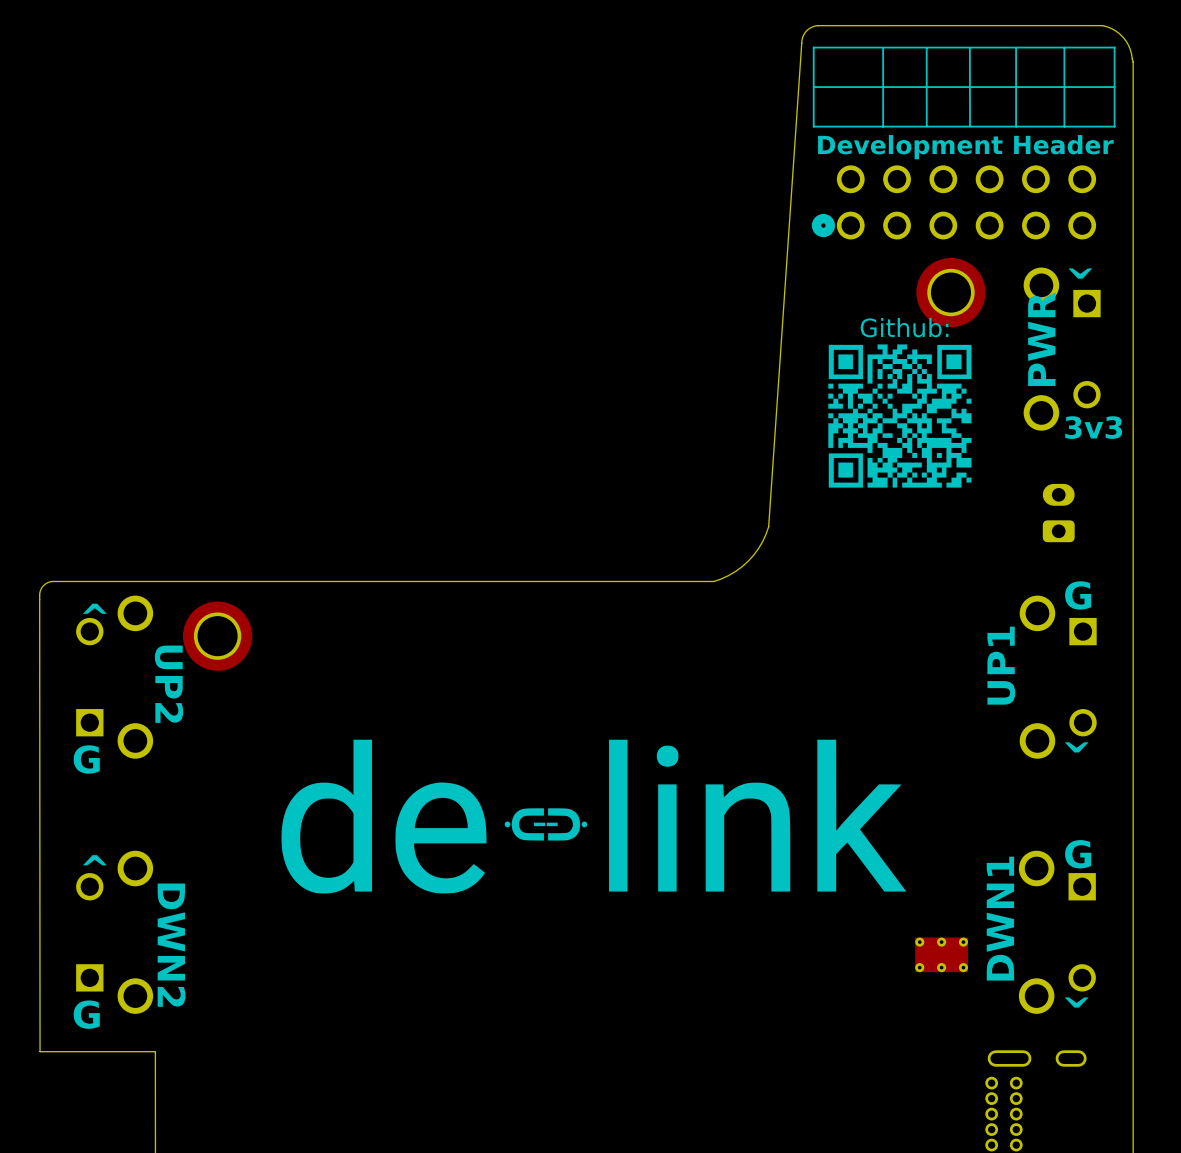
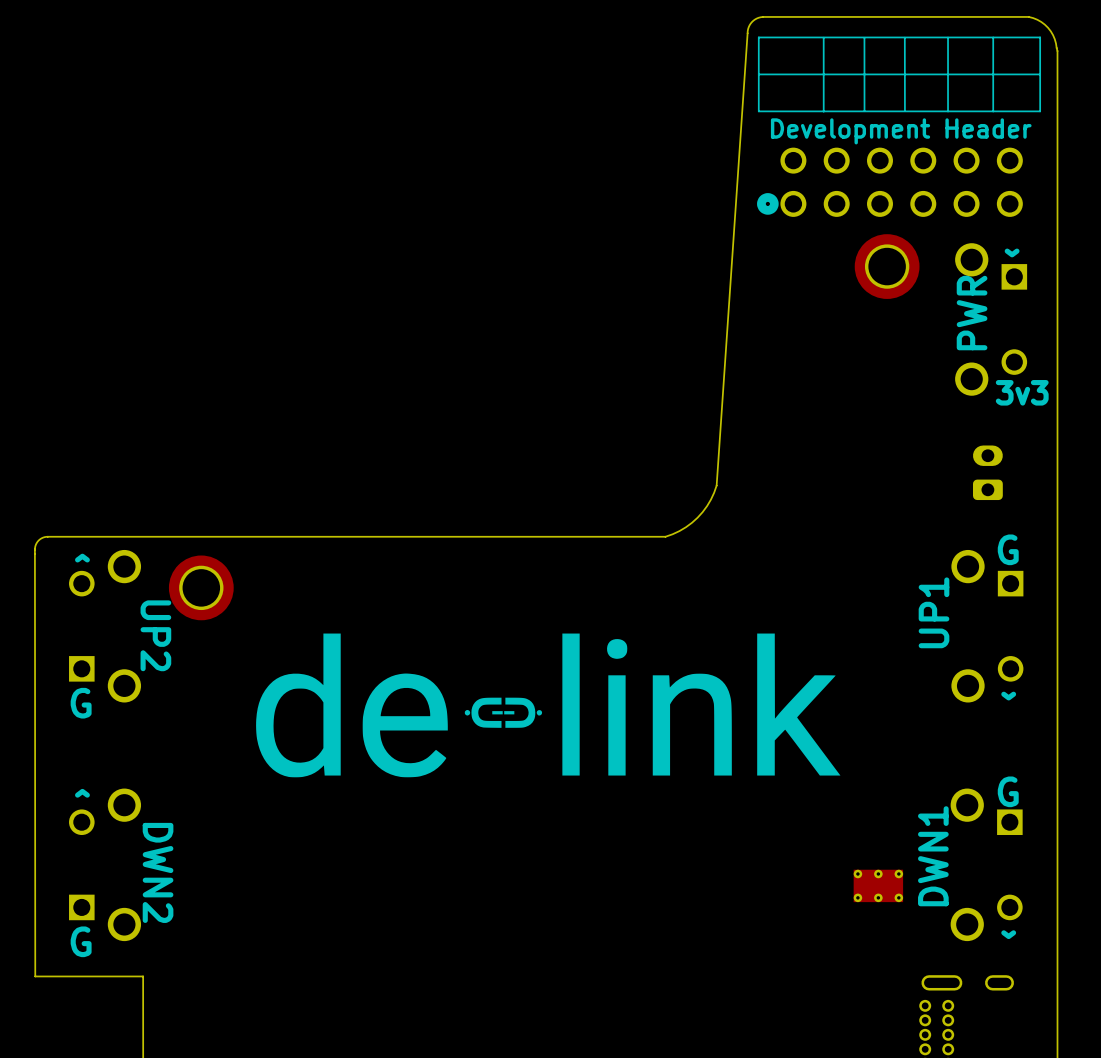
text: Github: (904, 327) -> none
drawing: [828, 344, 972, 488] -> none
drawing position: (593, 816) -> (548, 705)

